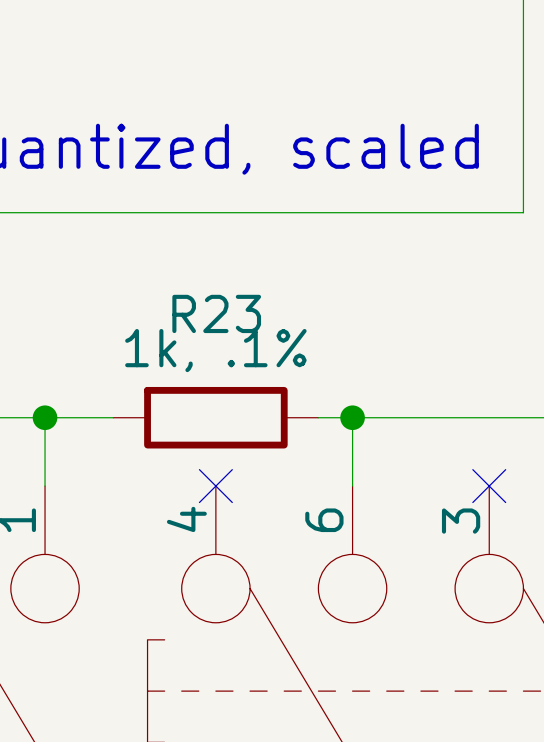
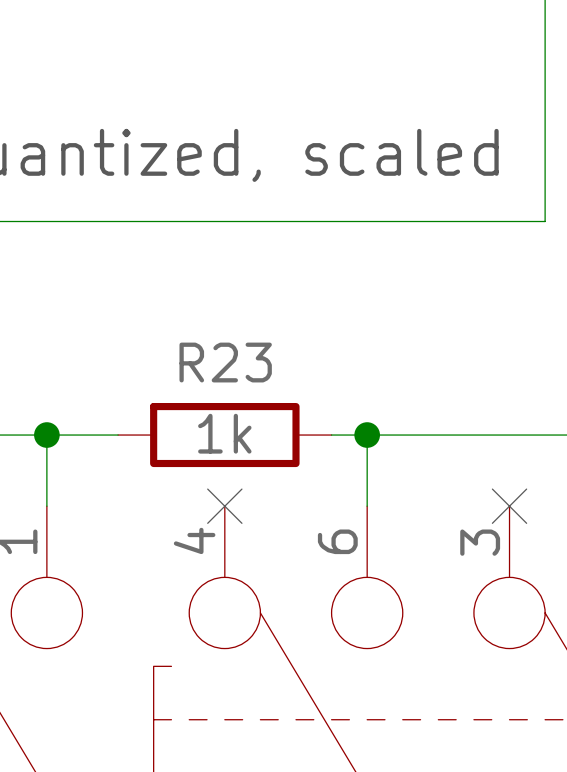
R23 name position: R23 (216, 313) -> R23 (225, 362)
R23 value: 1k, .1% (215, 350) -> 1k (224, 433)

